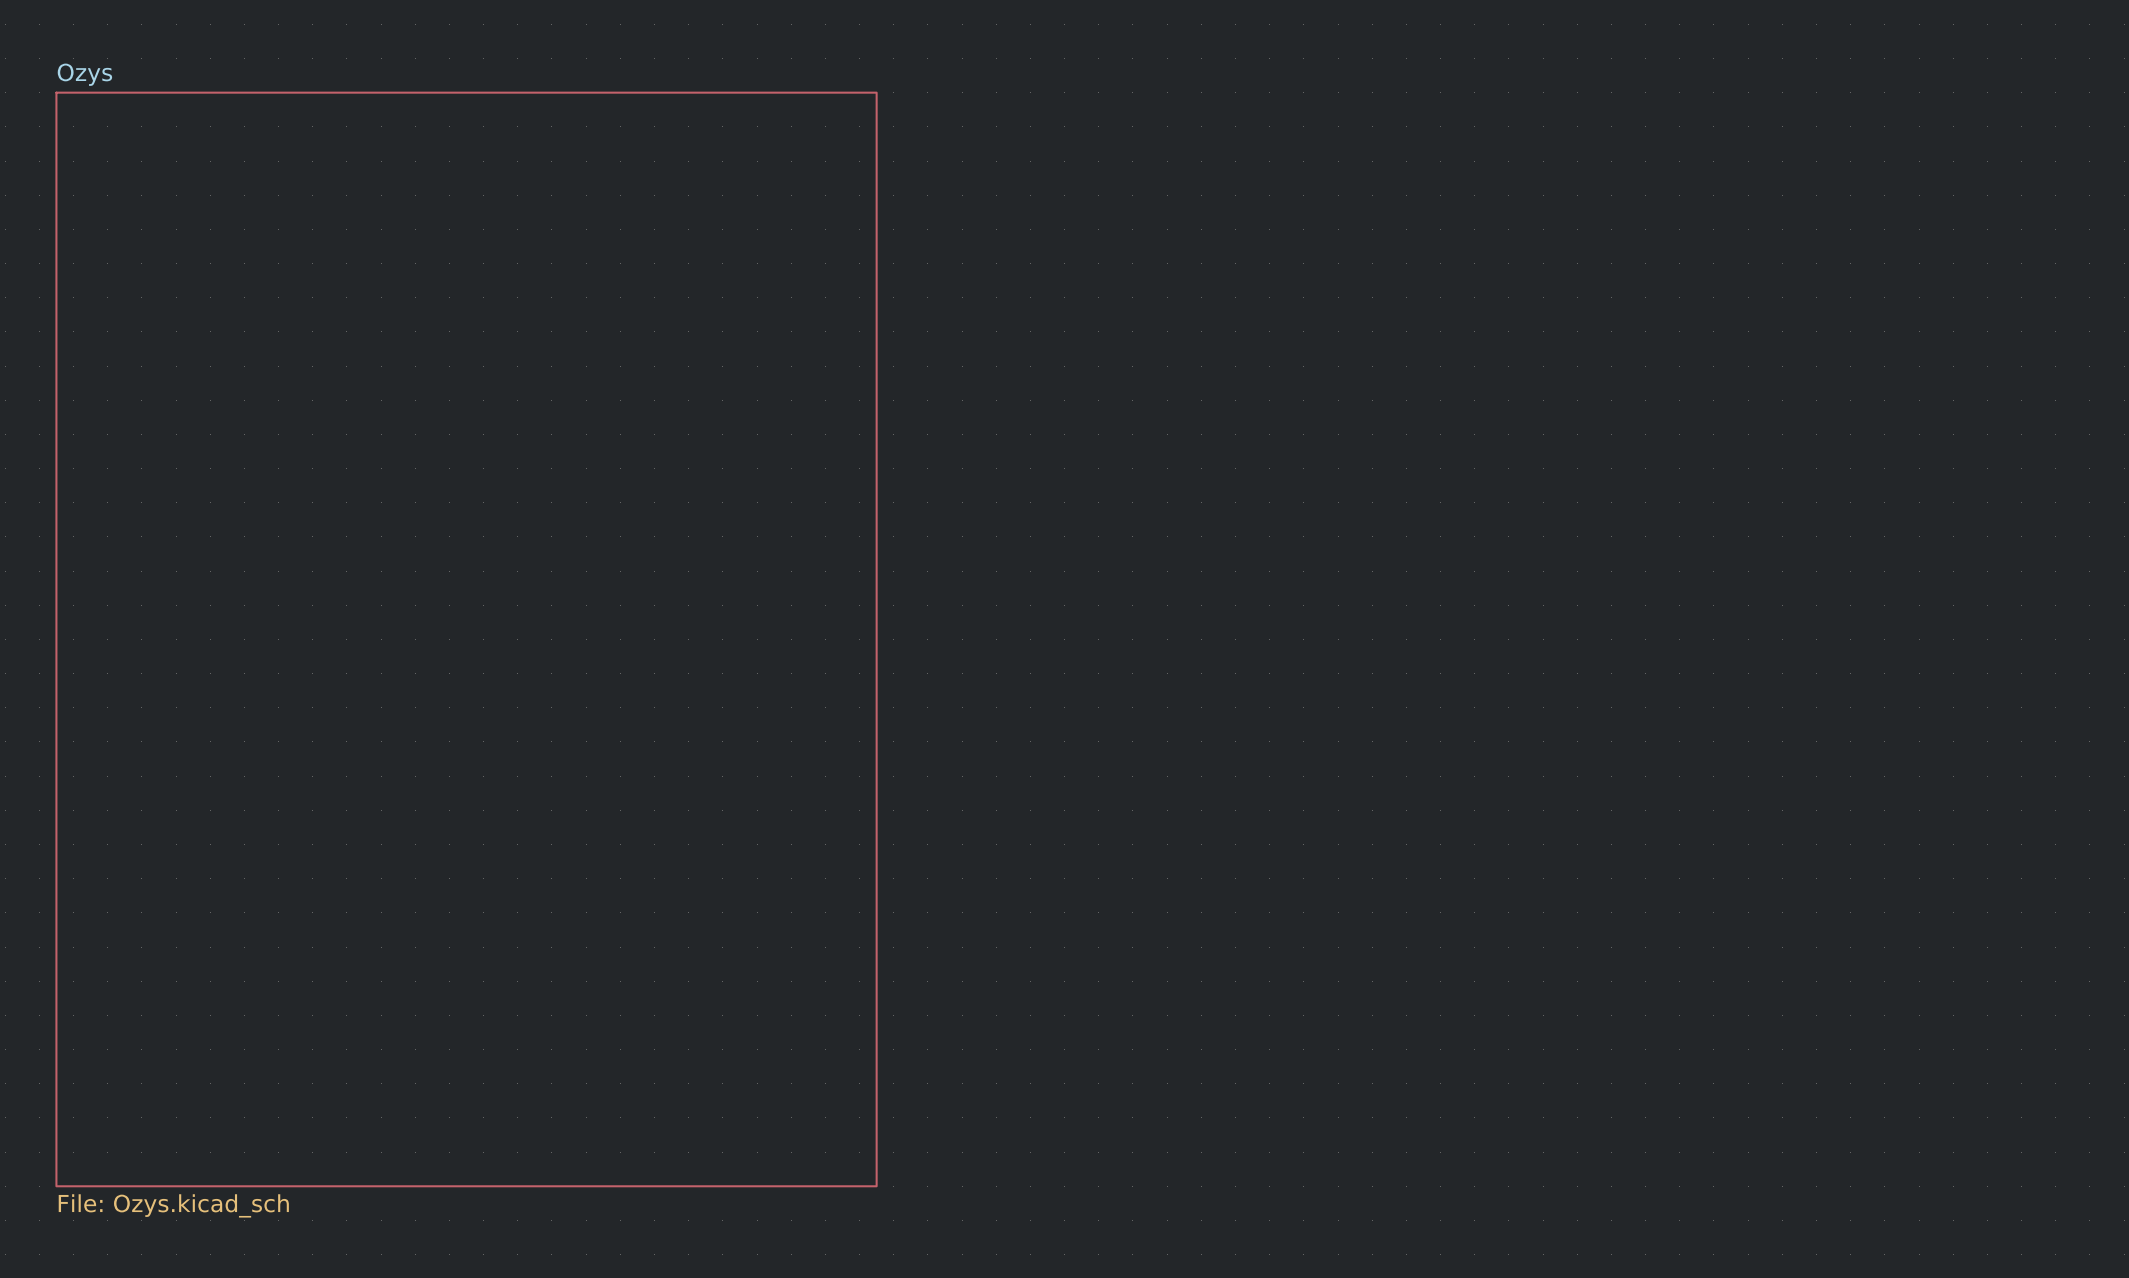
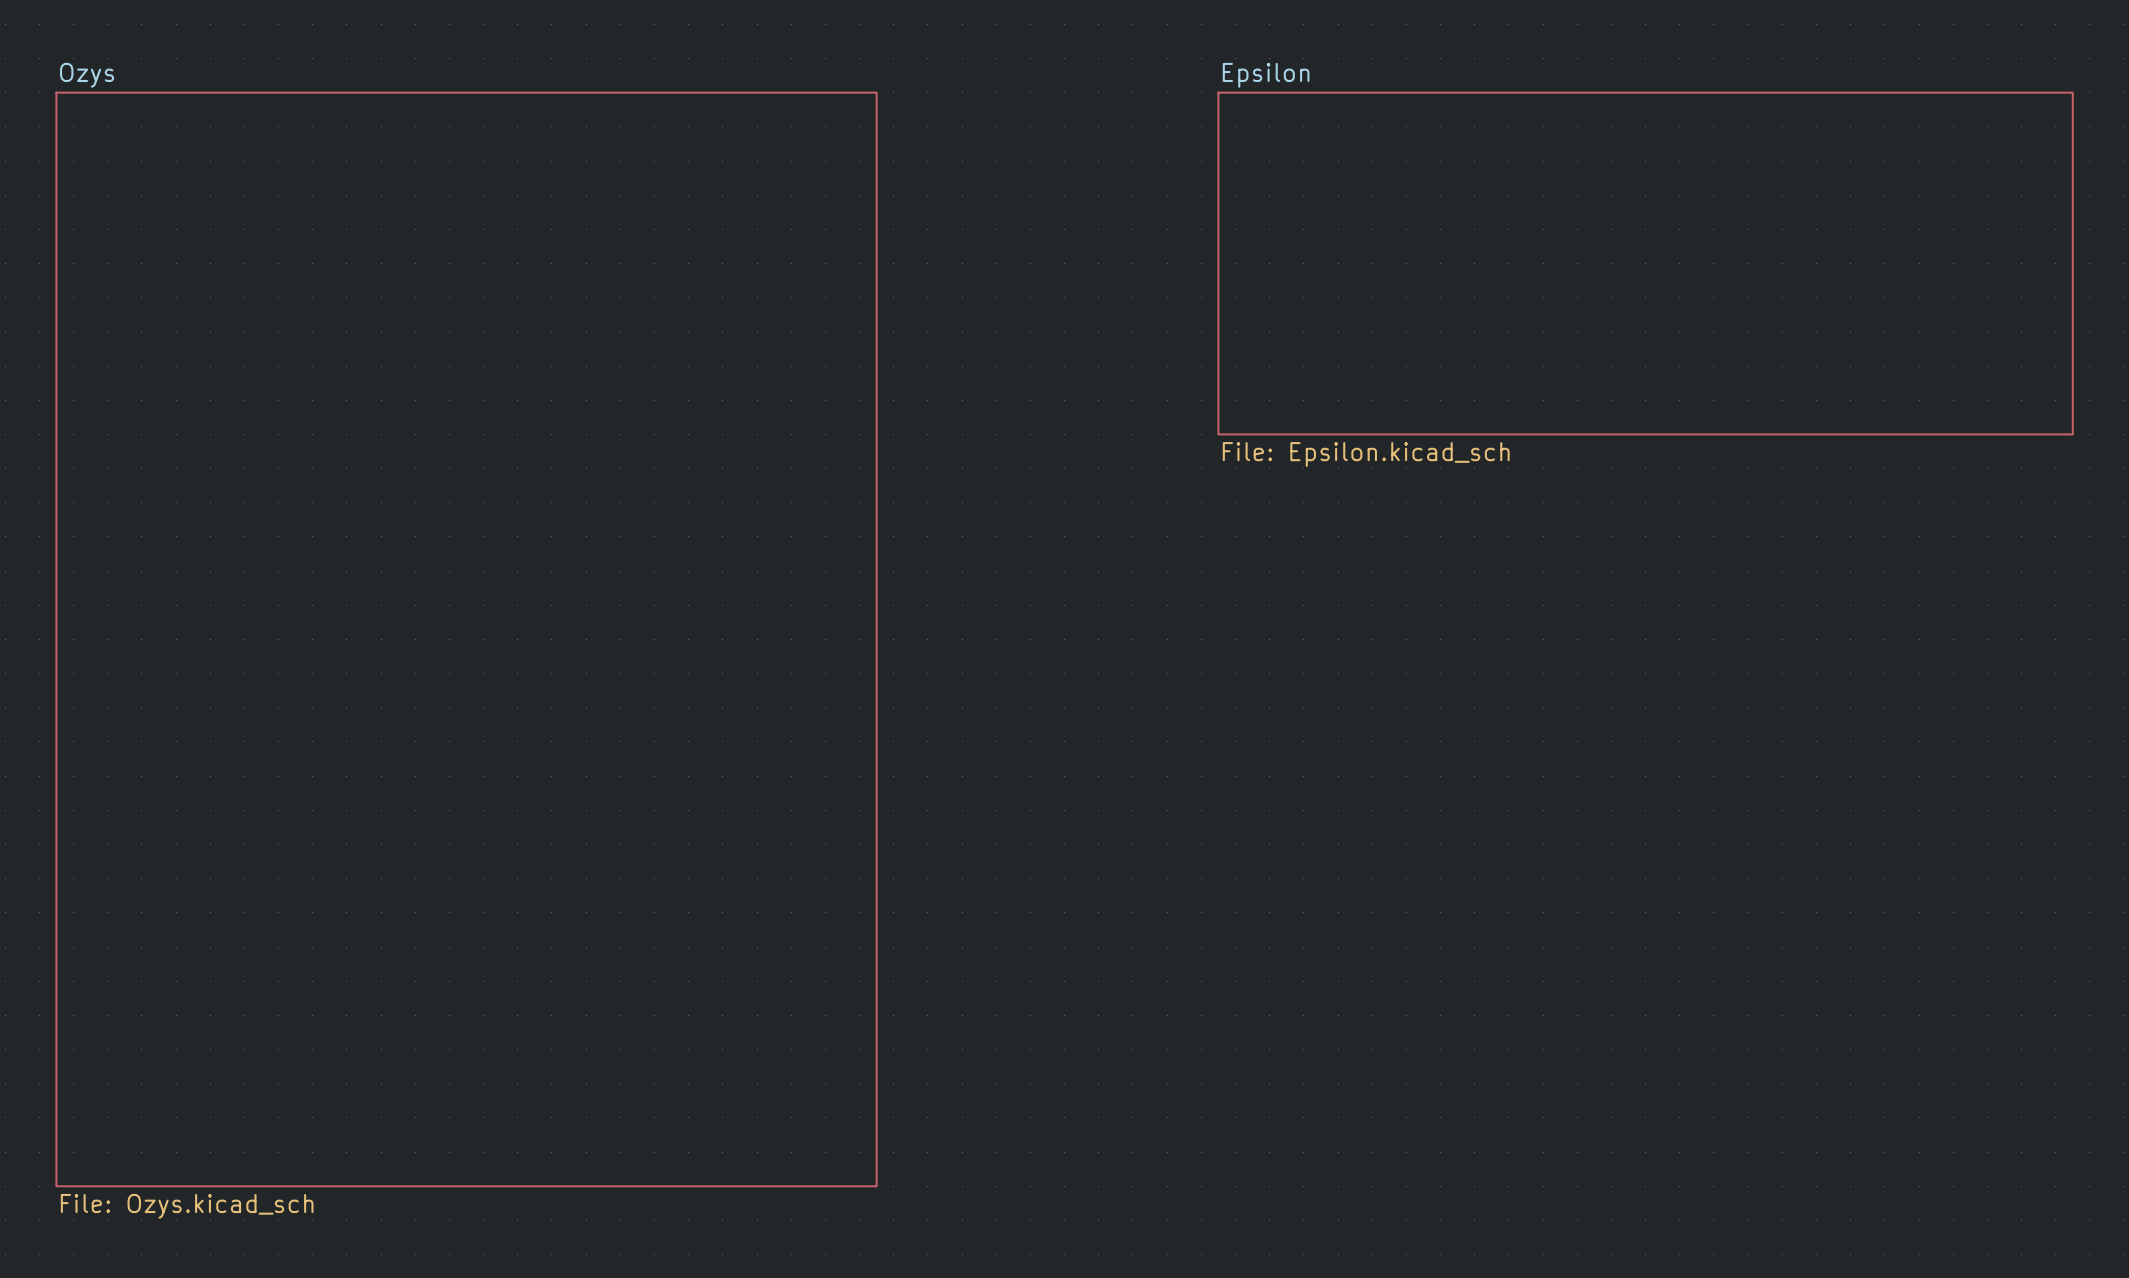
sheet Epsilon: none -> File: Epsilon.kicad_sch (1645, 263)

